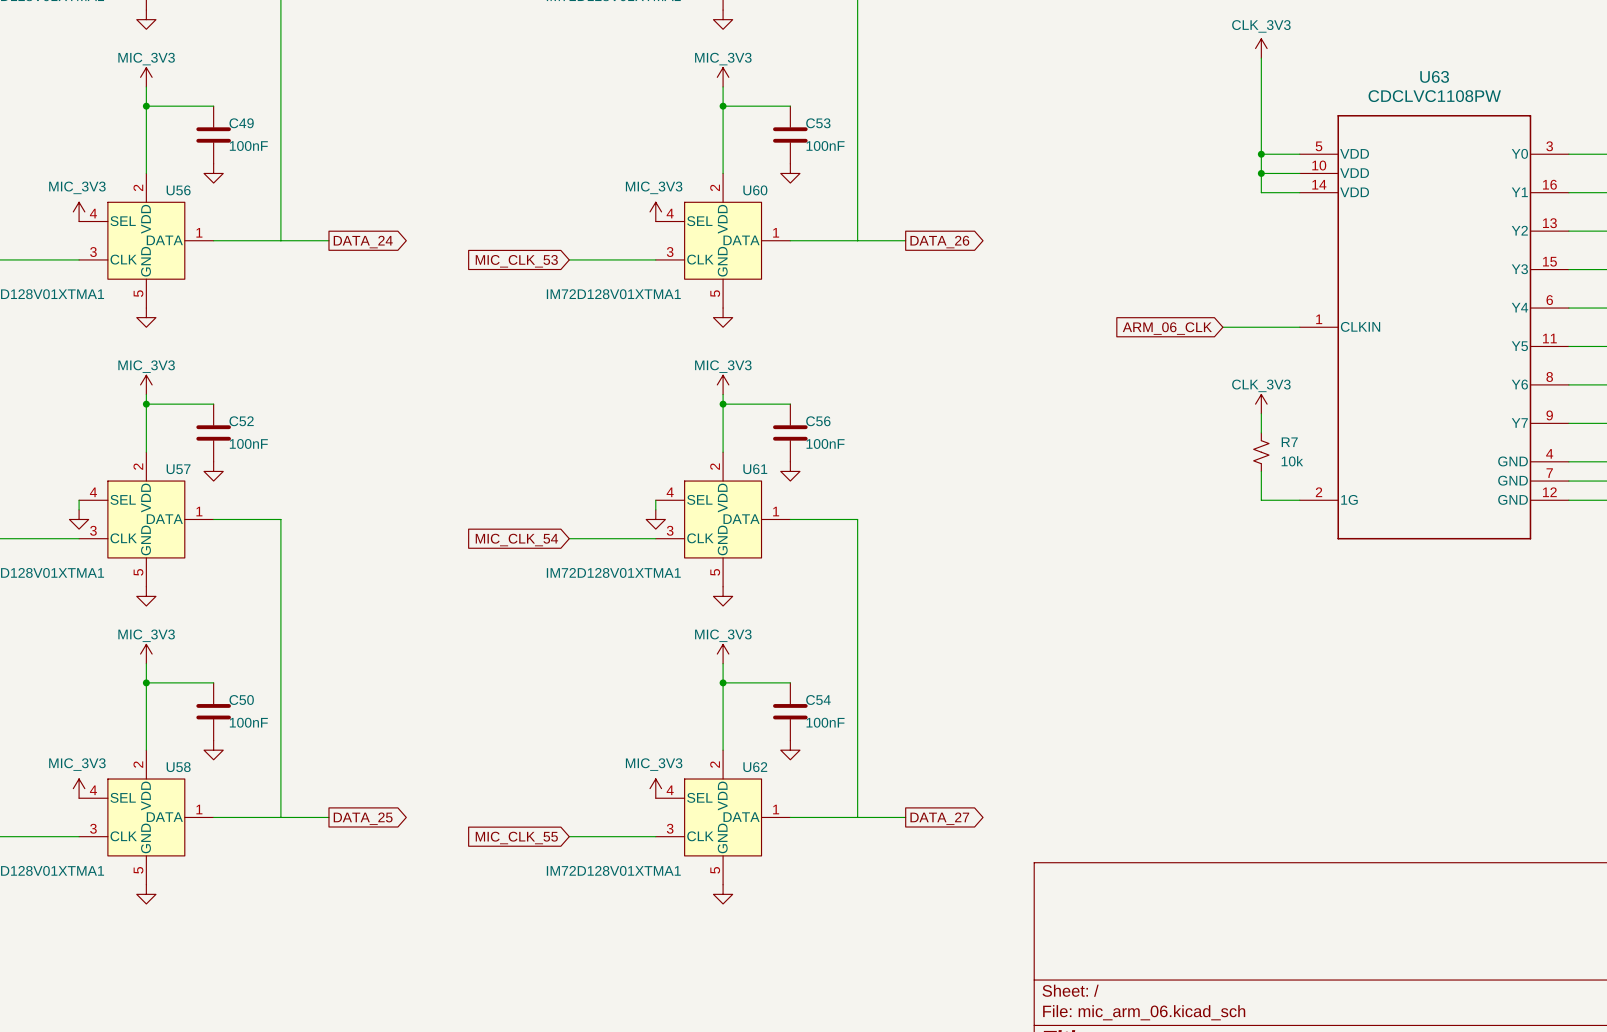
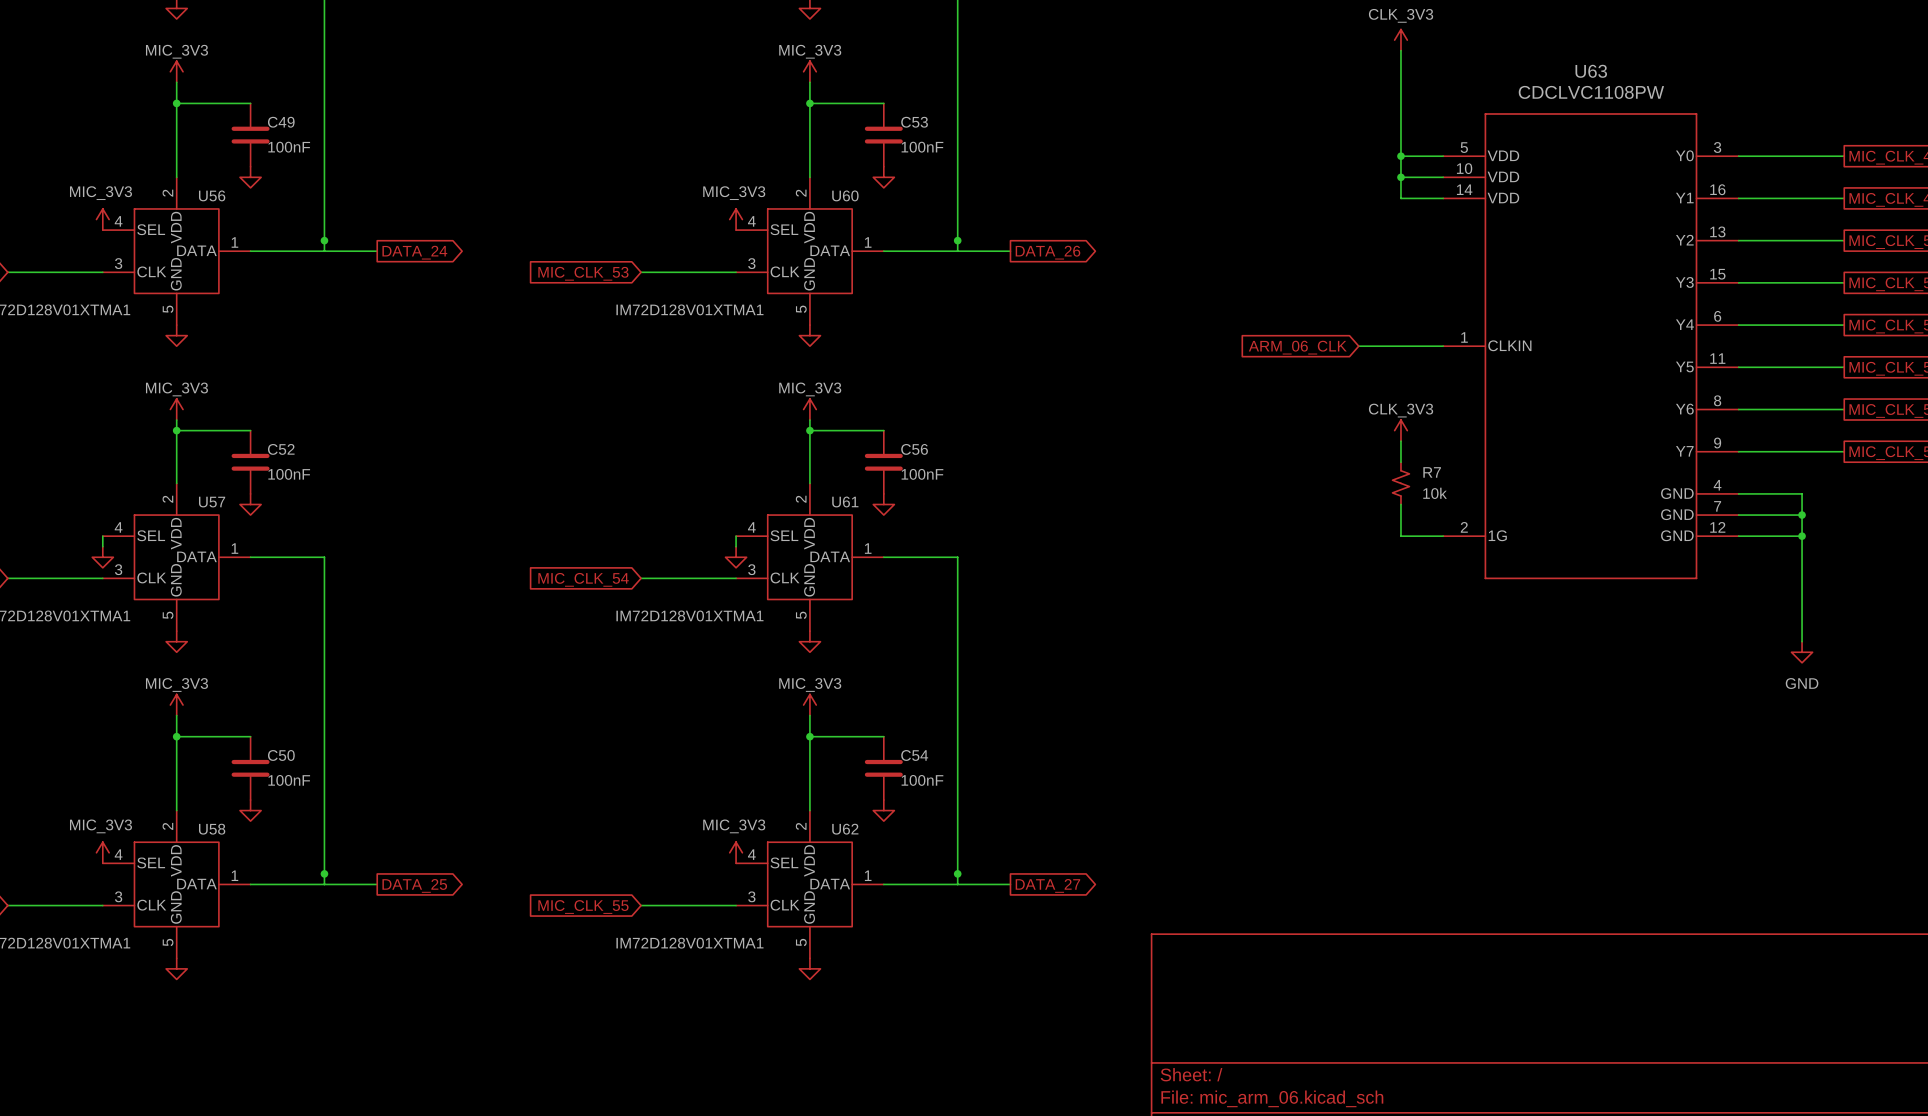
junction: none -> (324, 240)
junction: none -> (957, 240)
junction: none -> (324, 873)
junction: none -> (957, 873)

